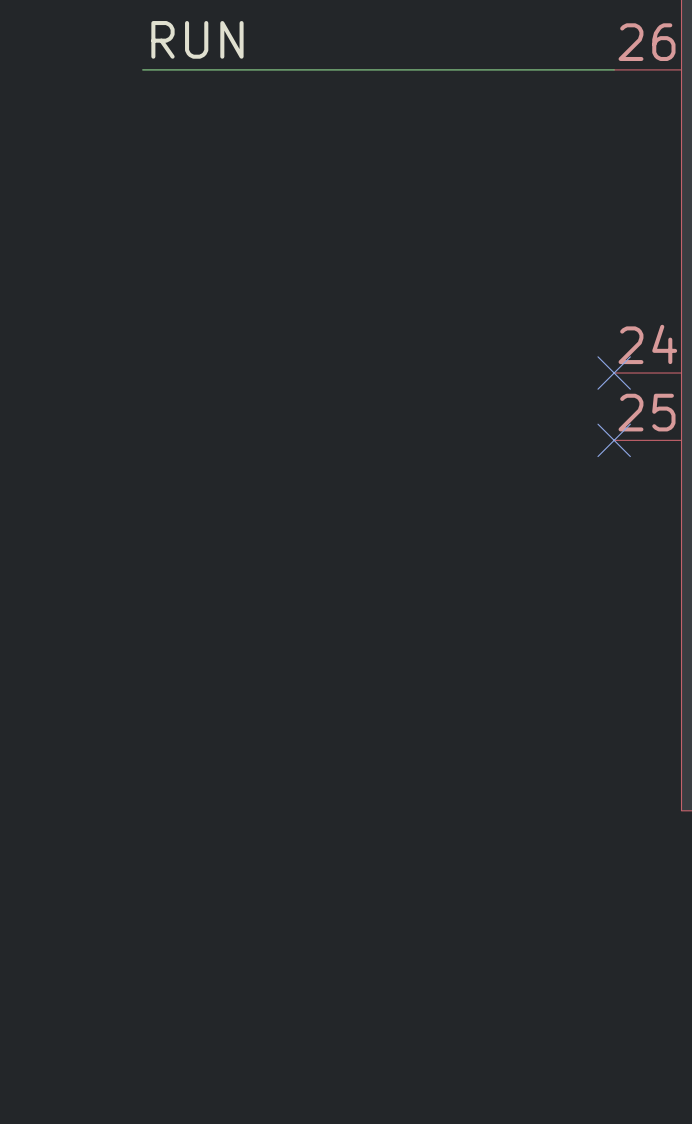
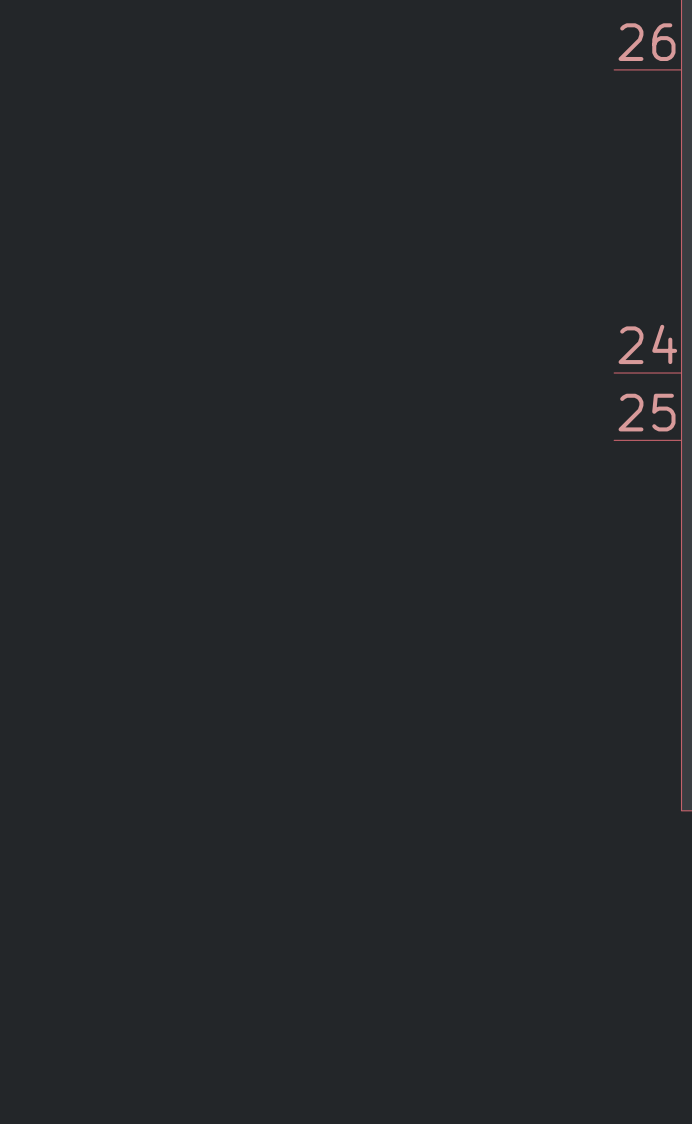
label: RUN (197, 39) -> none
wire: (142, 69) (614, 69) -> none
no-connect mark: (614, 373) -> none
no-connect mark: (614, 440) -> none

